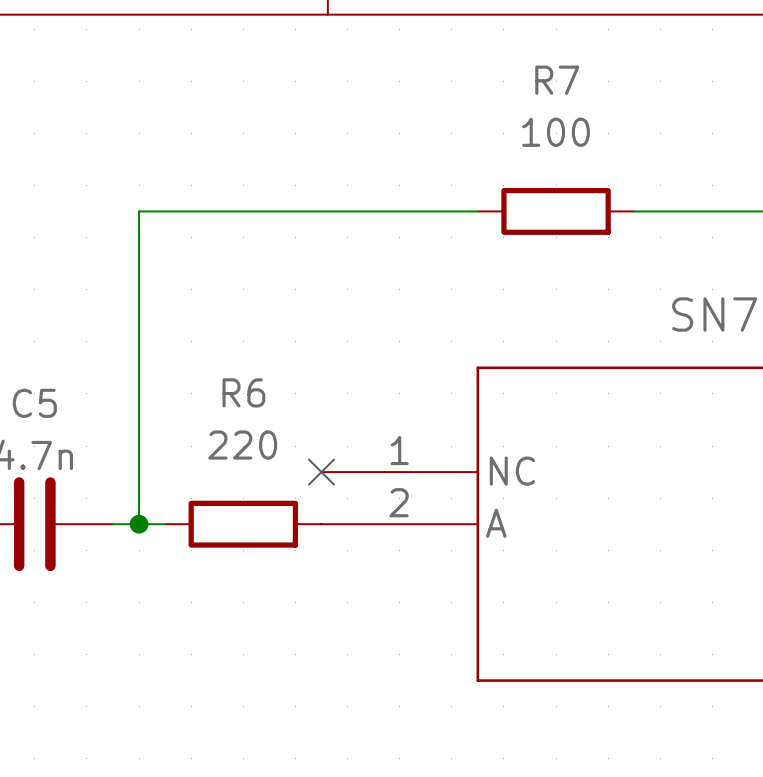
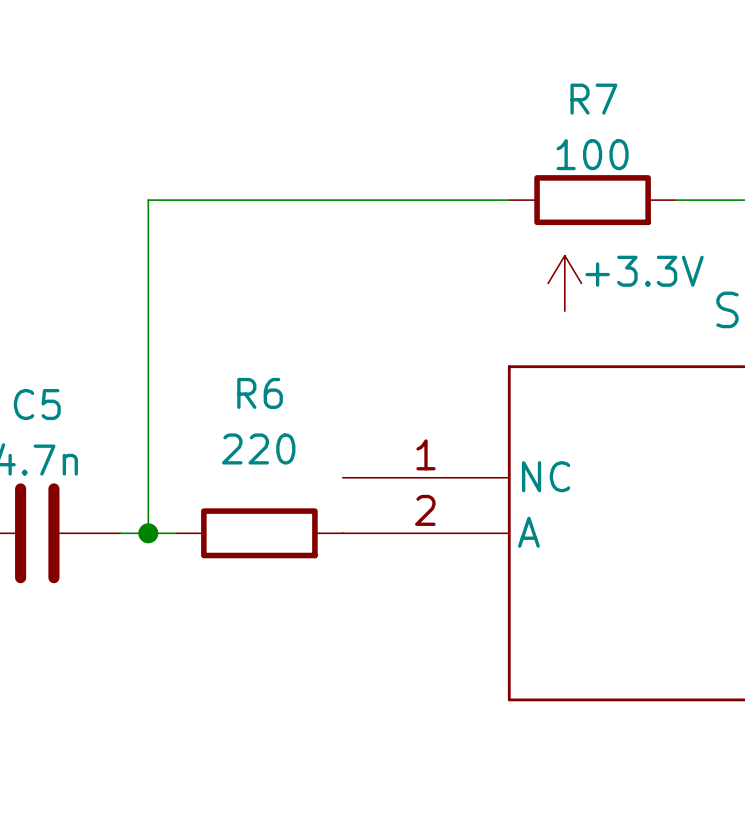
R7 name position: R7 (557, 80) -> R7 (593, 99)
R7 value position: 100 (556, 132) -> 100 (592, 154)
power symbol: none -> +3.3V (564, 283)
no-connect mark: (321, 472) -> none

